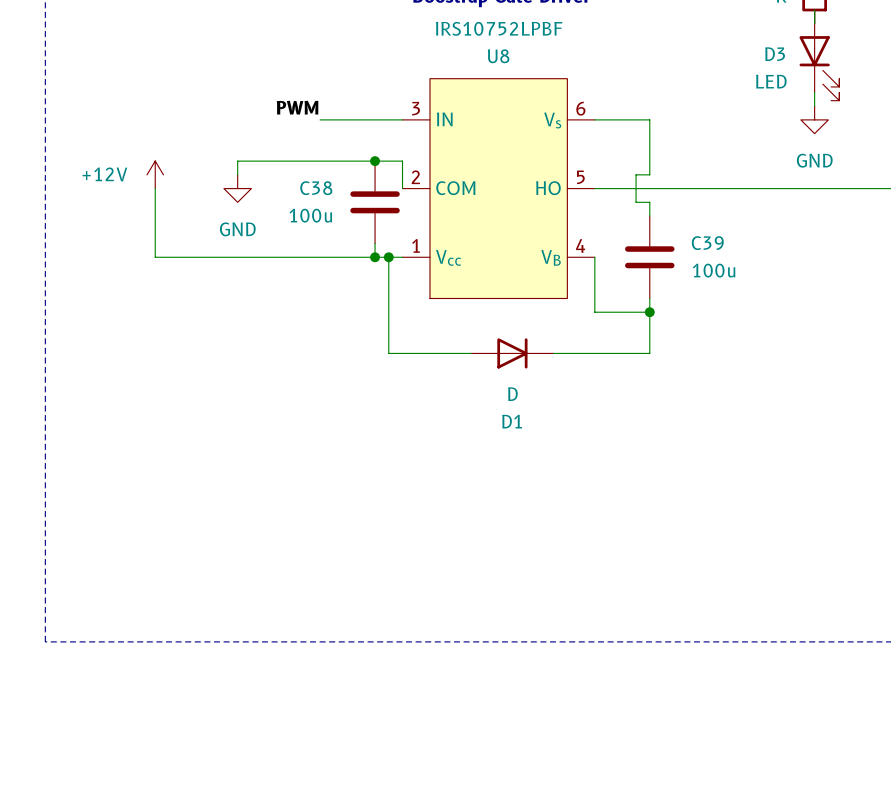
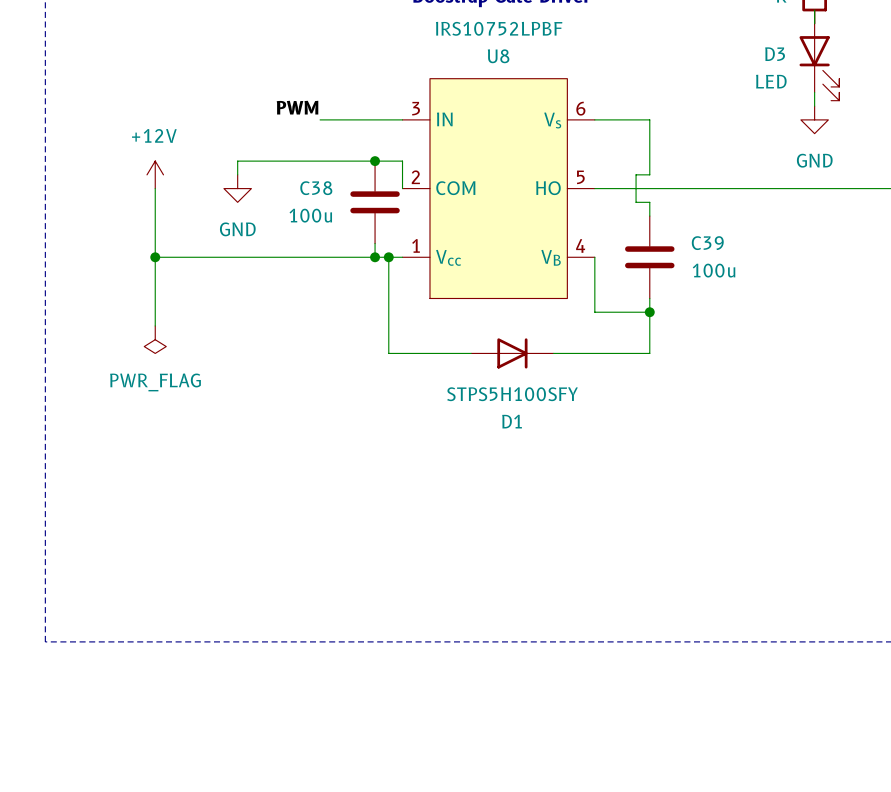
power symbol text position: +12V (104, 174) -> +12V (154, 135)
wire: none -> (155, 257) (155, 325)
junction: none -> (155, 257)
power symbol: none -> PWR_FLAG (155, 339)
D1 value: D (512, 394) -> STPS5H100SFY (512, 394)

